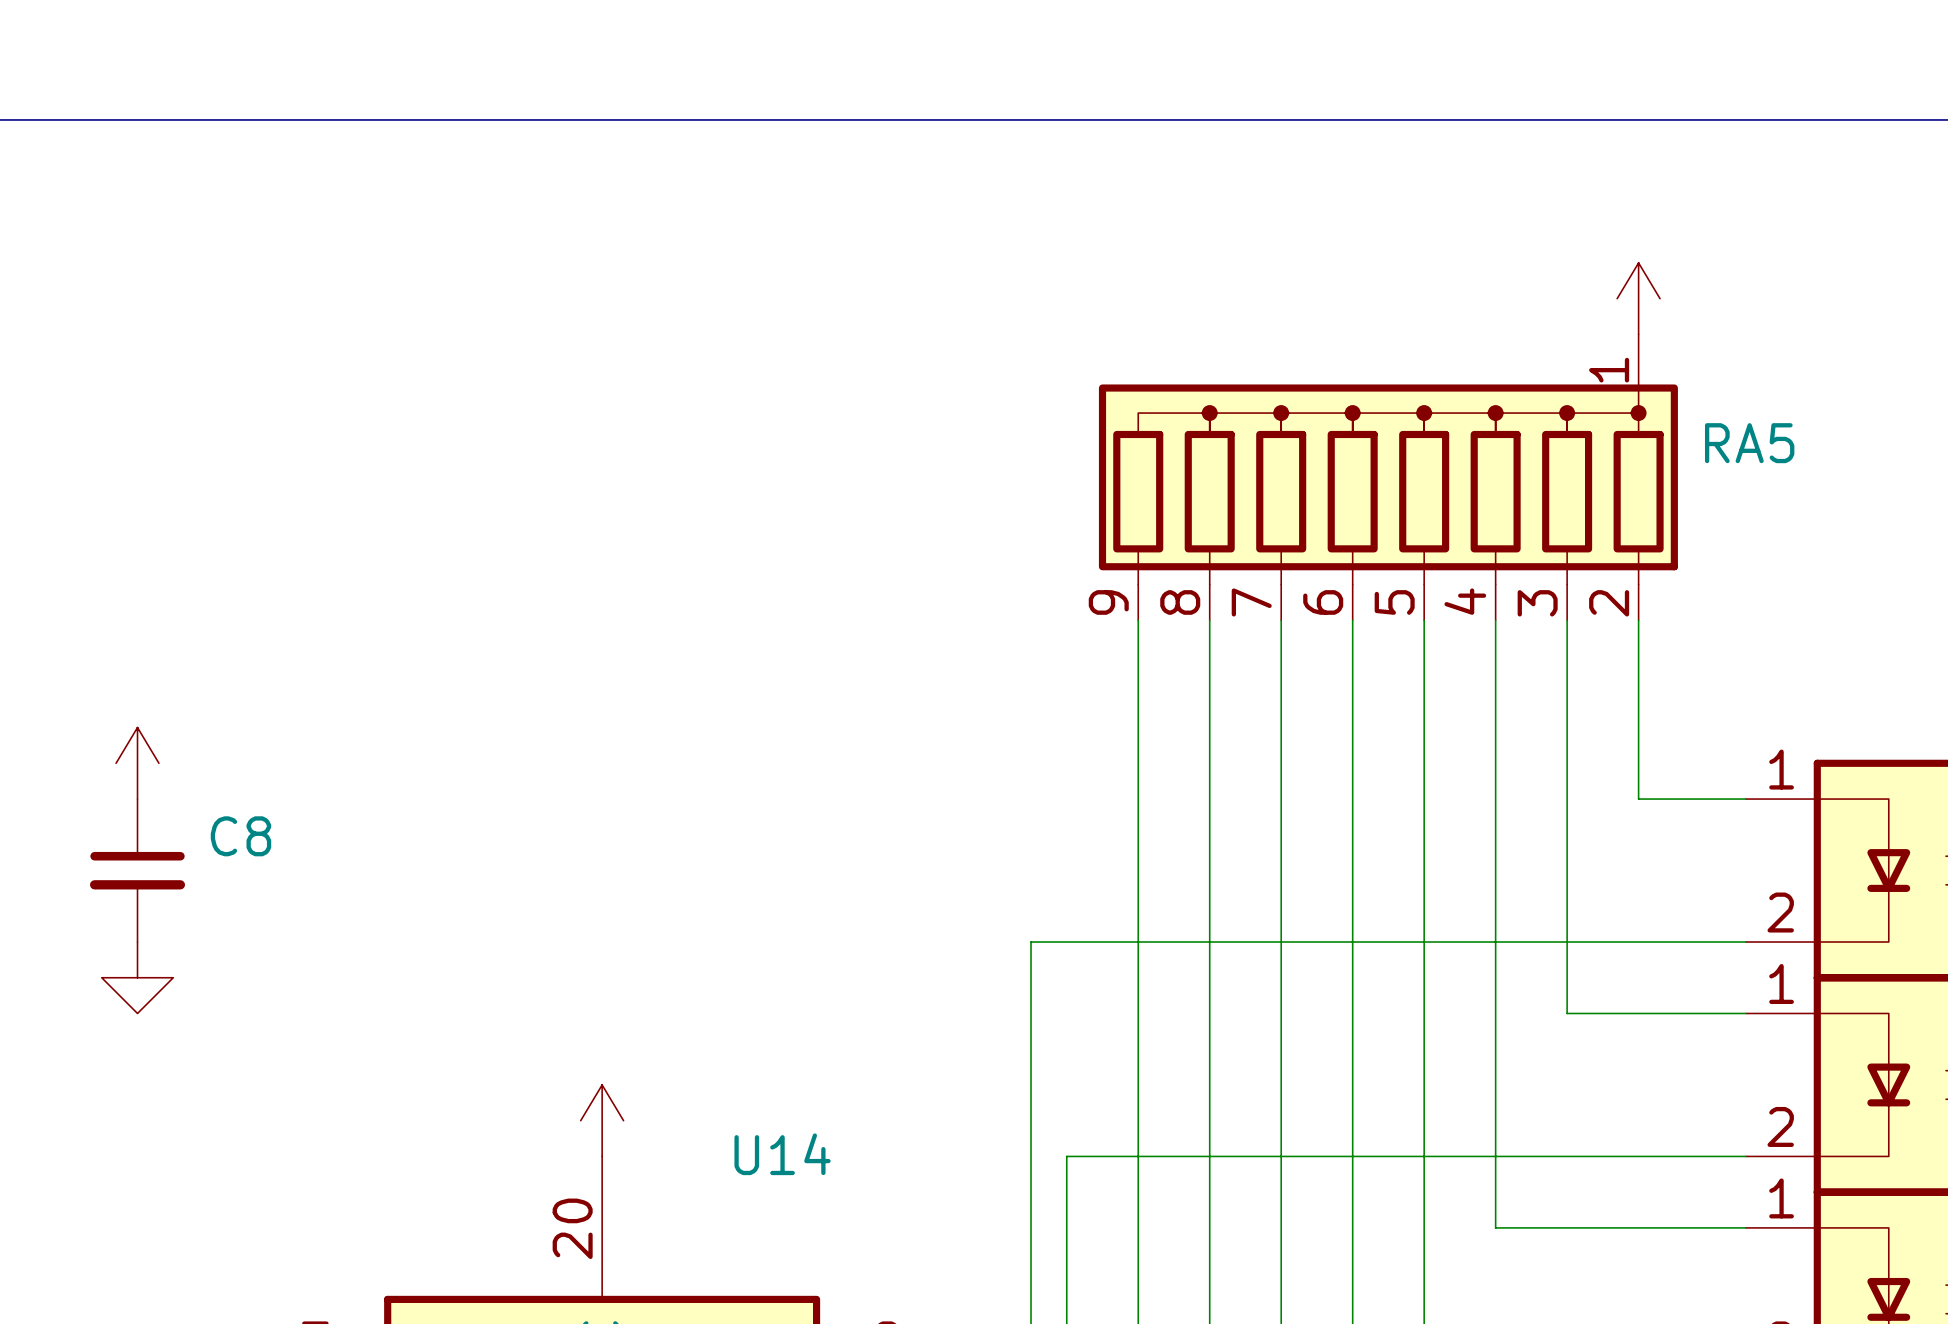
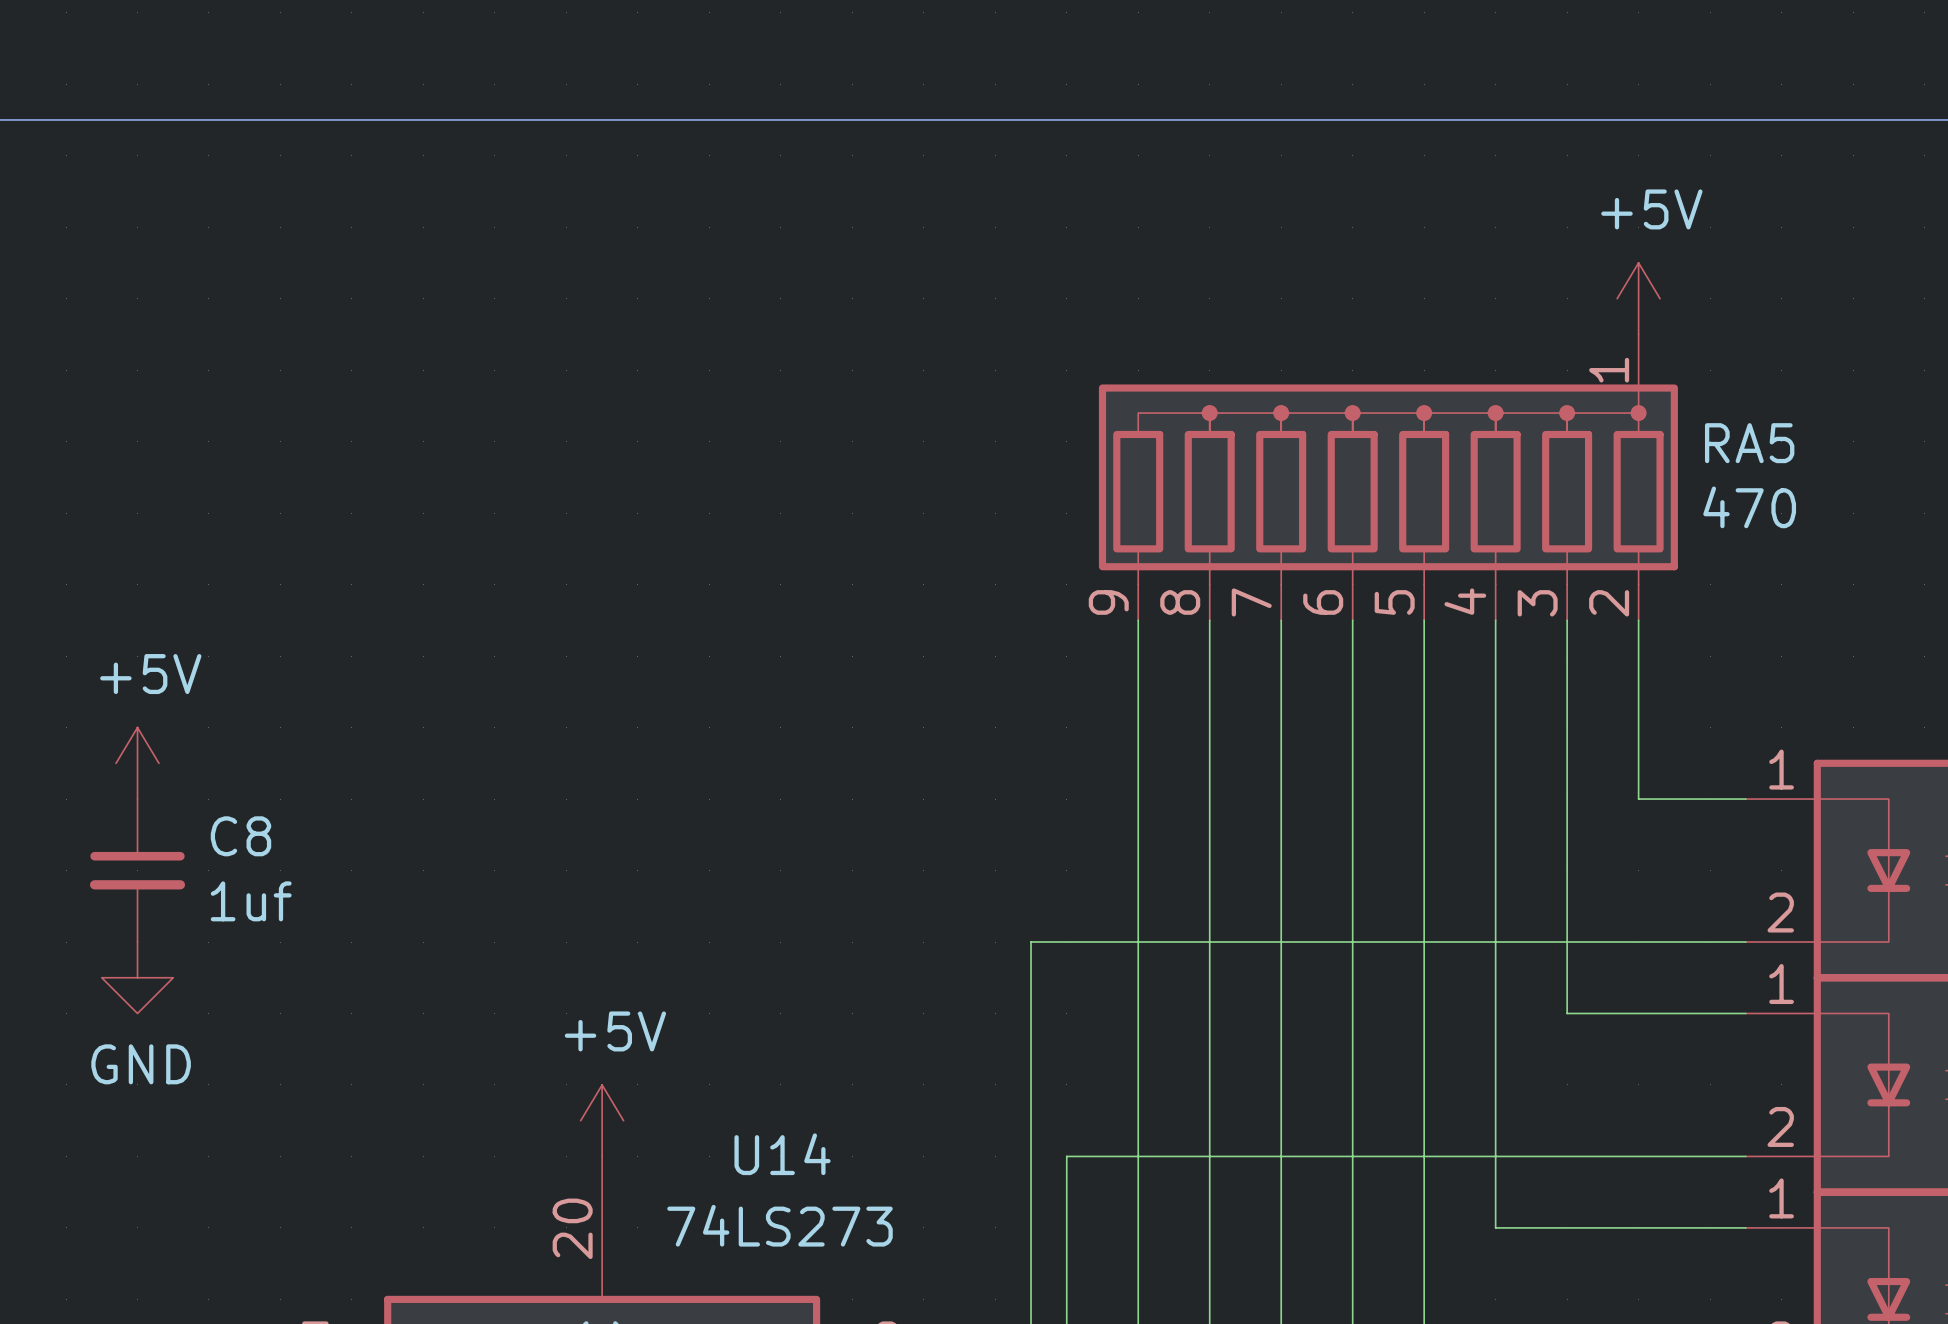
power symbol text: none -> +5V (1651, 209)
RA5 value: none -> 470 (1749, 507)
power symbol text: none -> +5V (150, 674)
C8 value: none -> 1uf (251, 901)
power symbol text: none -> +5V (615, 1031)
power symbol text: none -> GND (141, 1064)
U14 value: none -> 74LS273 (779, 1225)

